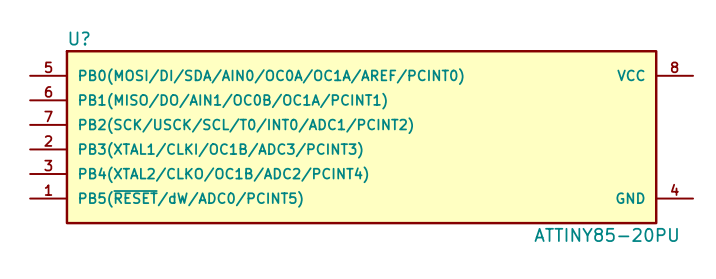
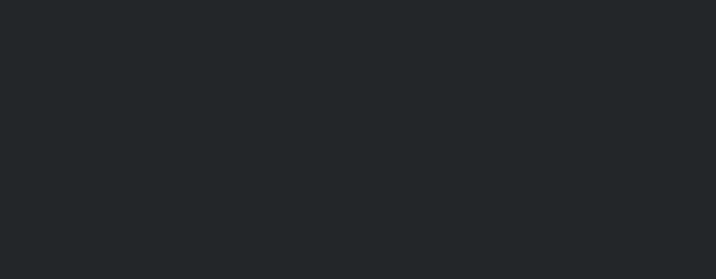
U?: ATTINY85-20PU (361, 137) -> none

